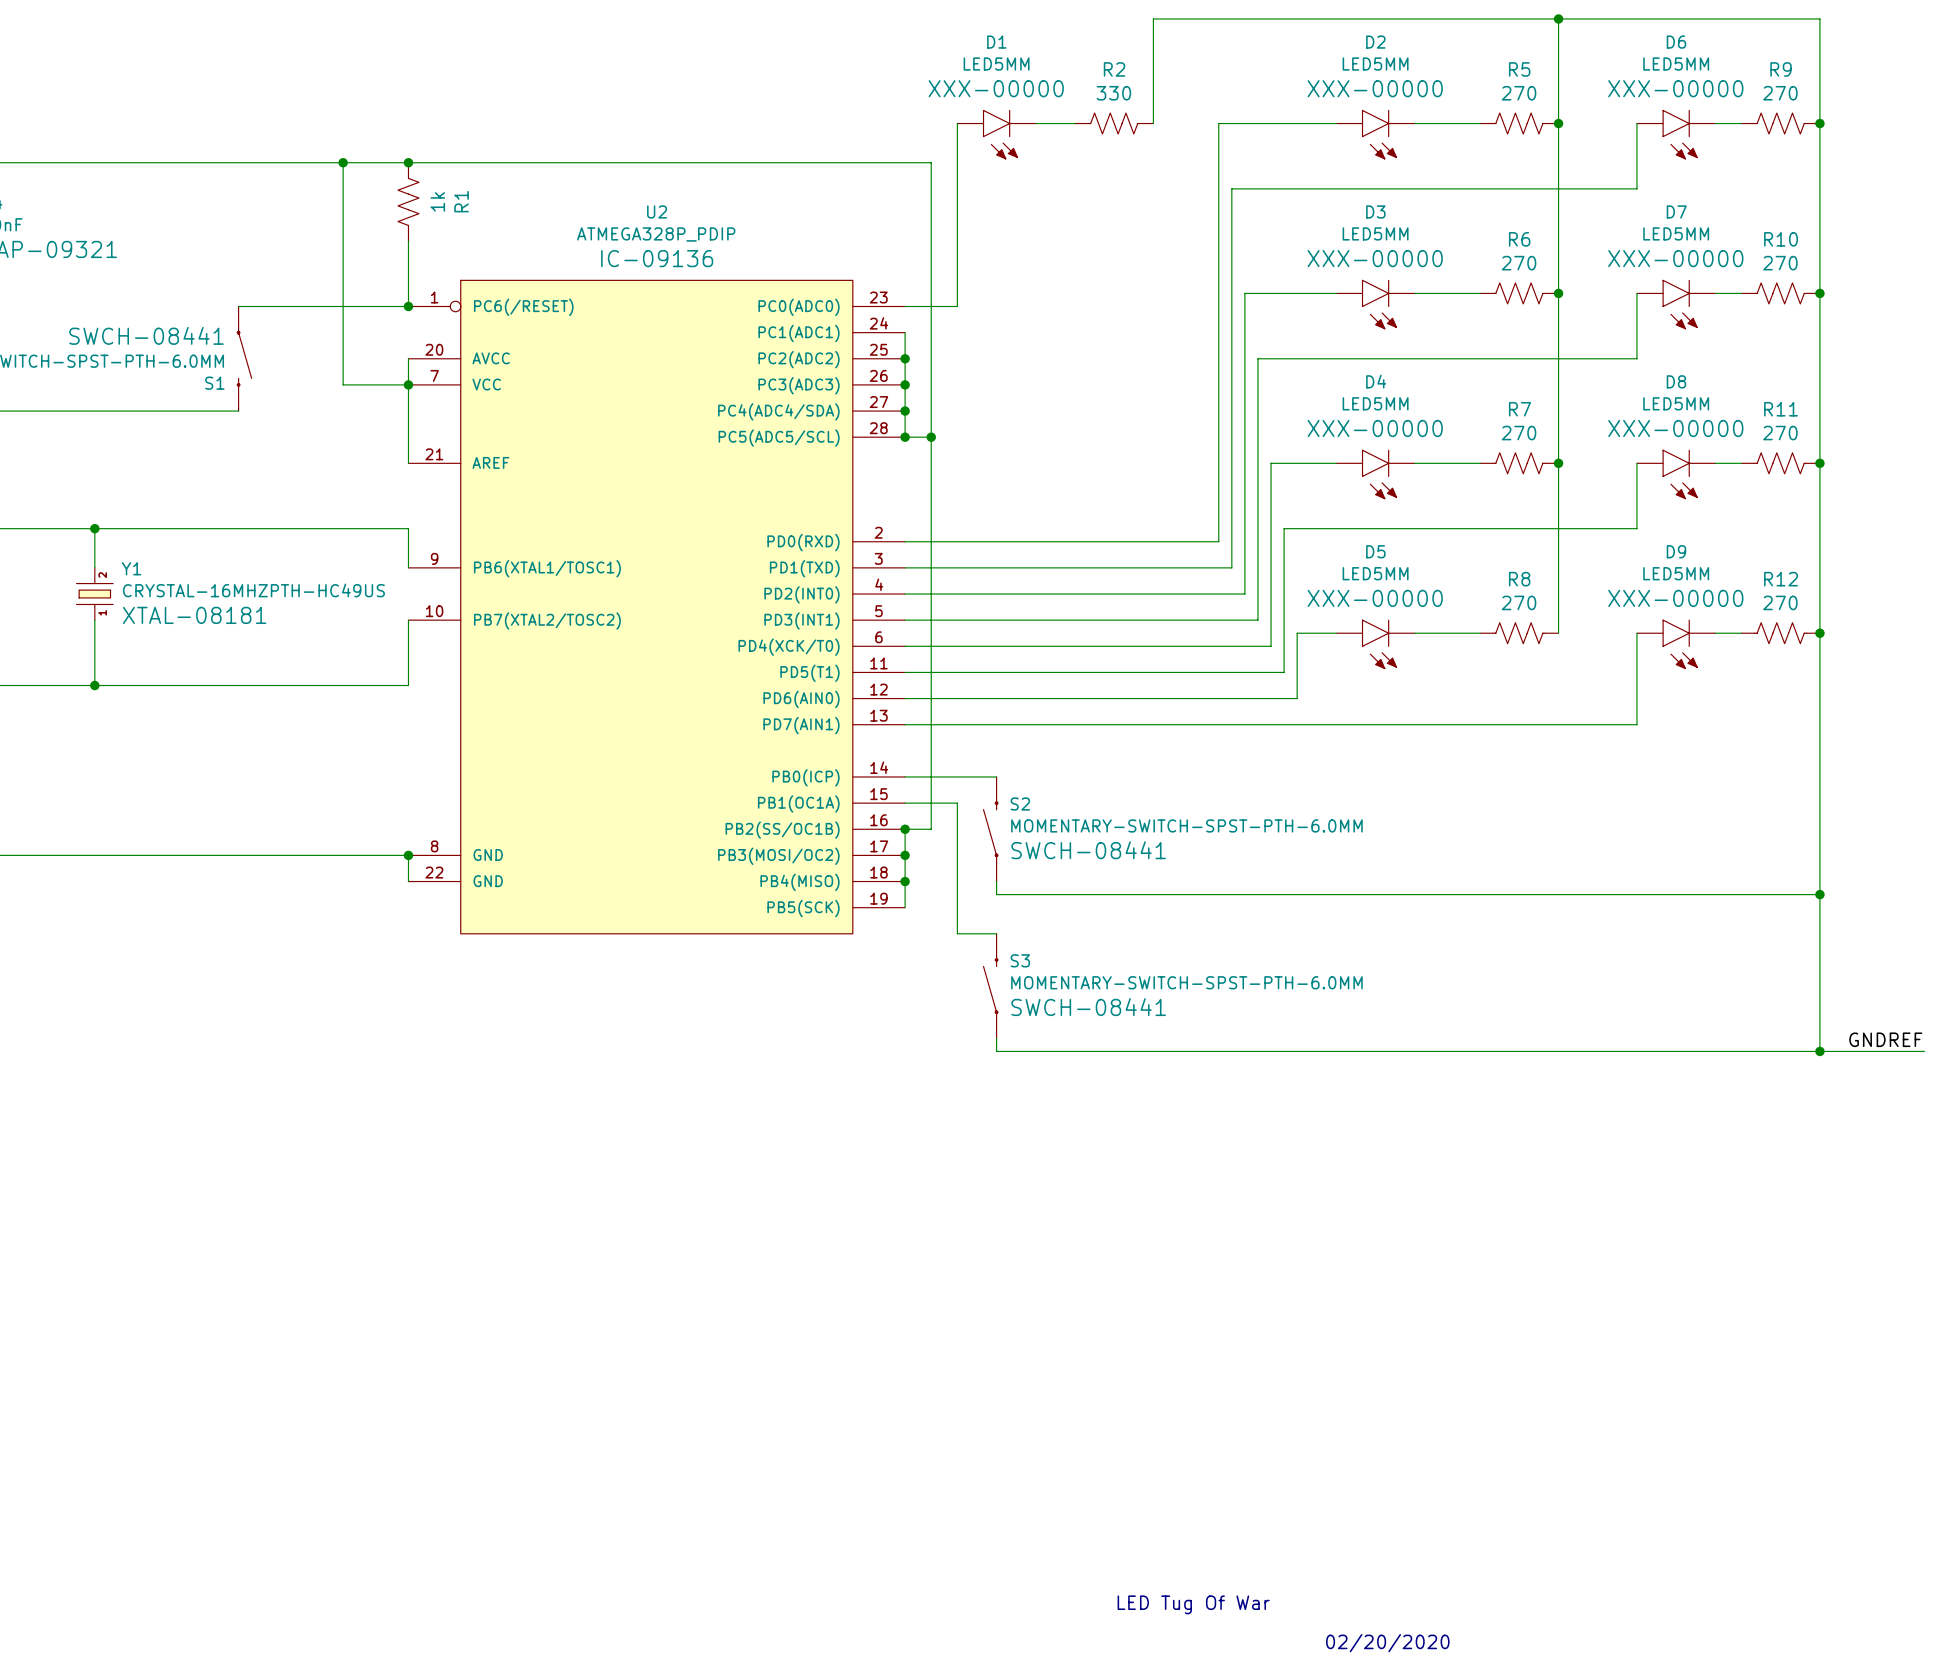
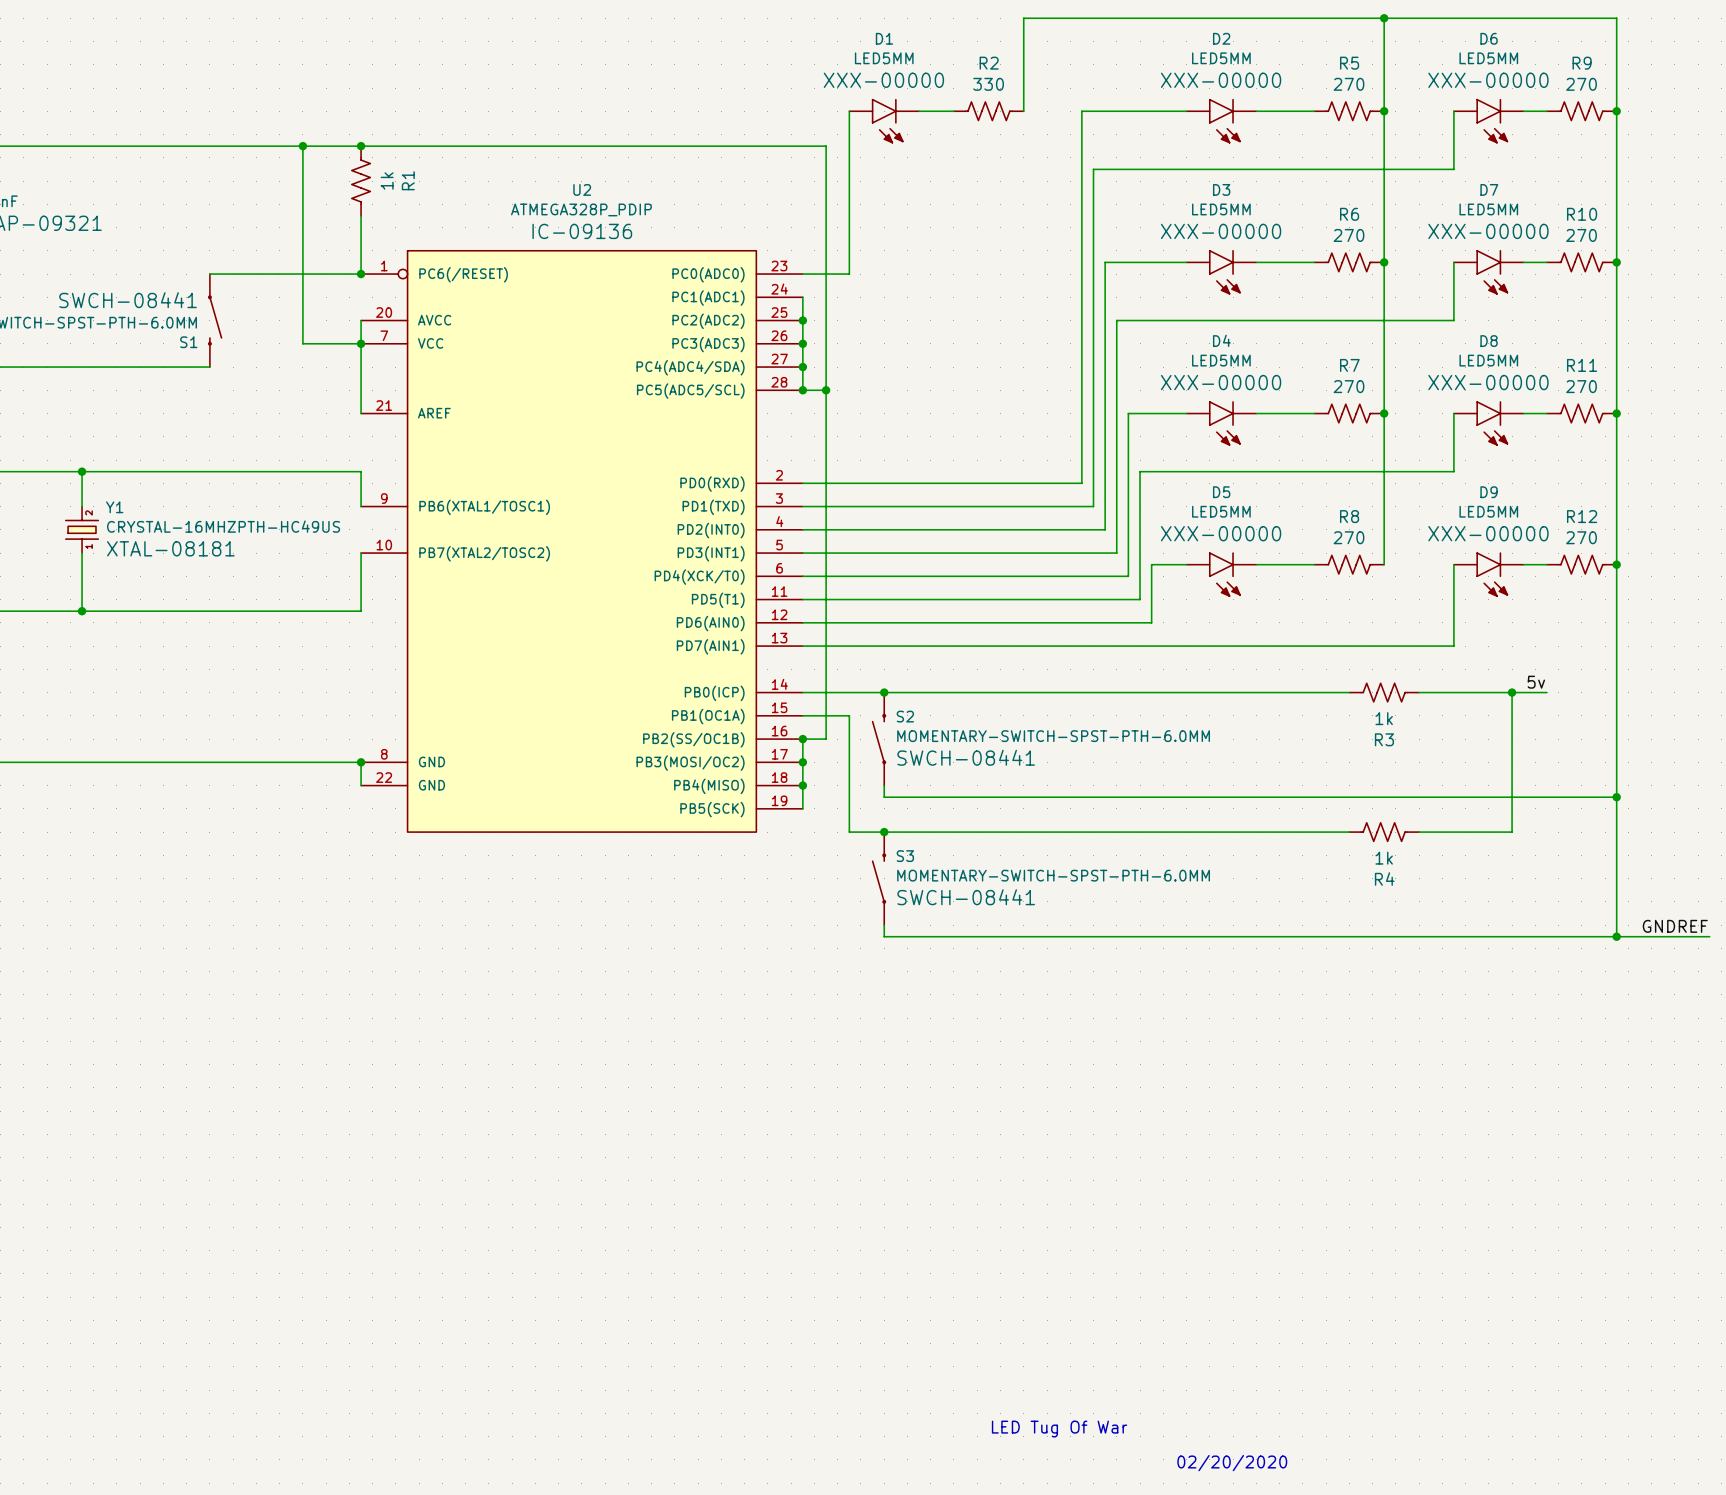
label: none -> 5v (1536, 682)
wire: none -> (884, 692) (1349, 692)
junction: none -> (884, 692)
R3: none -> 1k (1384, 692)
wire: none -> (1419, 692) (1546, 692)
wire: none -> (1512, 692) (1512, 832) (1419, 832)
junction: none -> (1512, 692)
wire: none -> (884, 832) (1349, 832)
junction: none -> (884, 832)
R4: none -> 1k (1384, 832)

